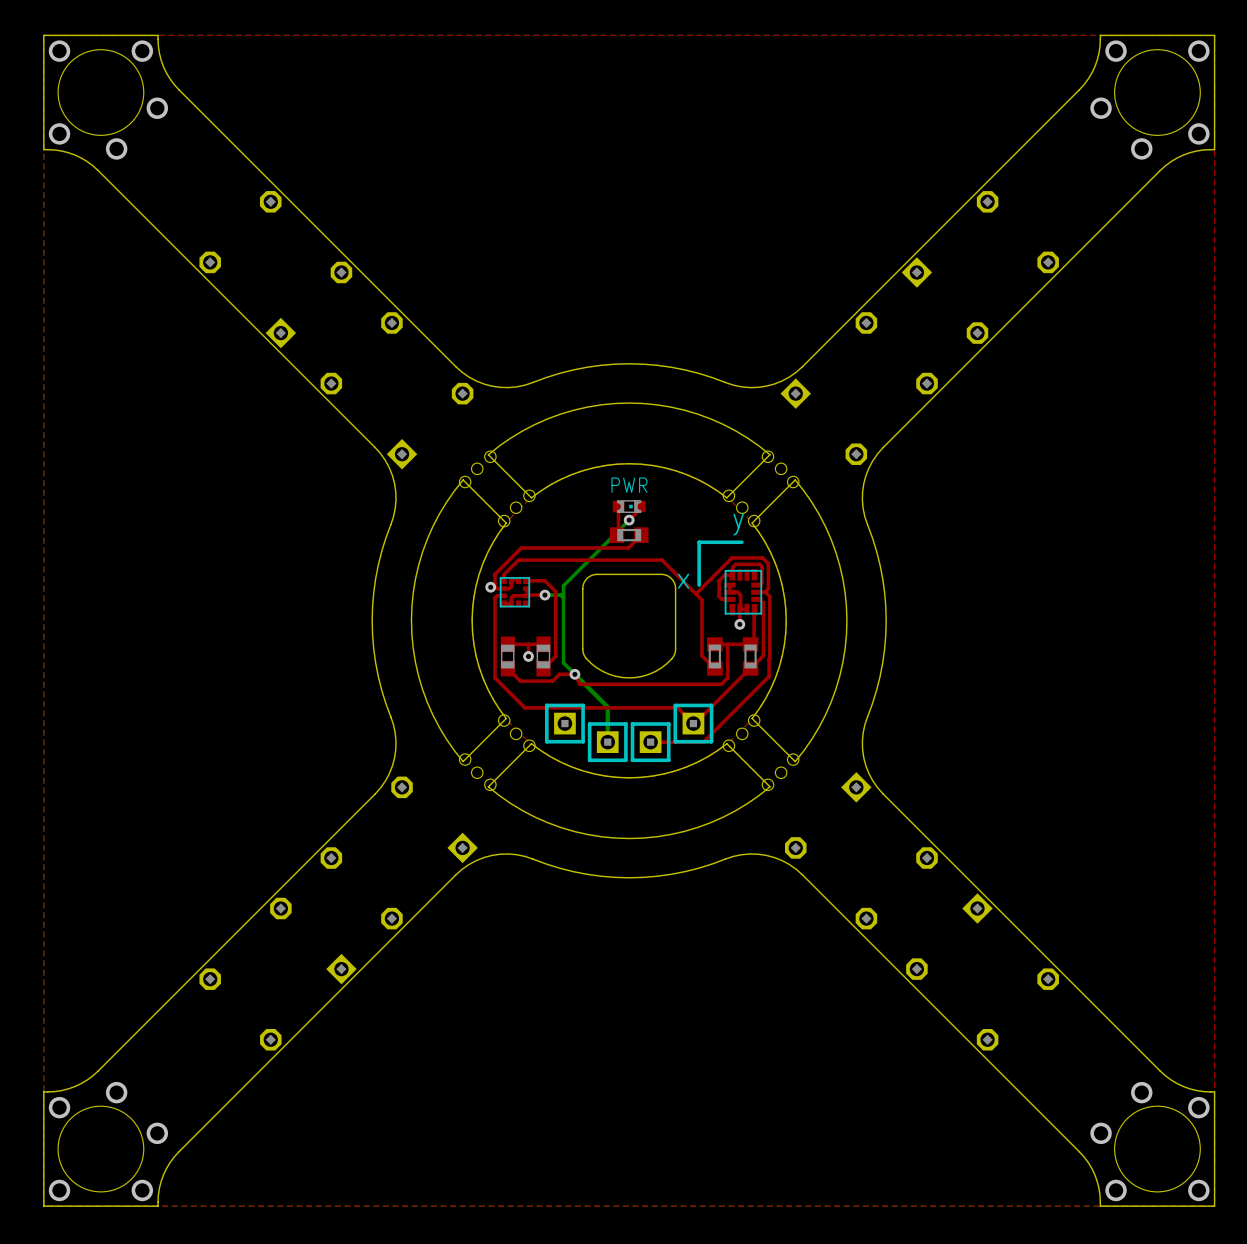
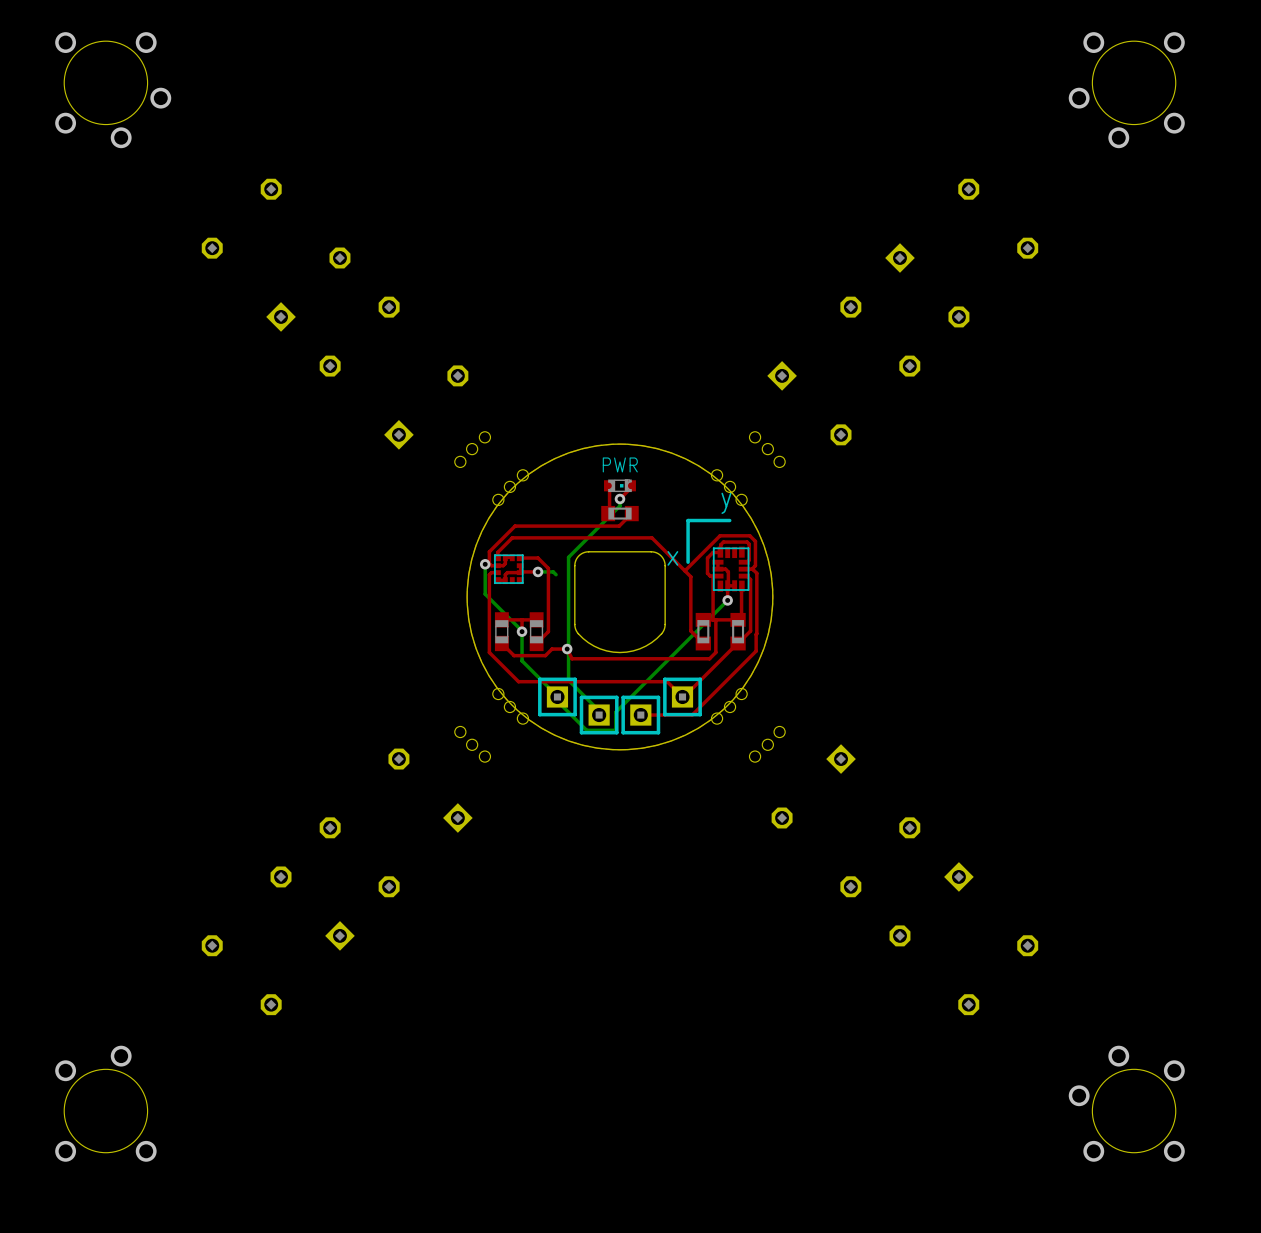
board edge: (43, 35) (43, 149) (61, 151) (75, 155) (98, 170) (375, 447) (385, 460) (392, 475) (395, 500) (393, 516) (378, 564) (373, 592) (372, 620) (373, 648) (378, 676) (395, 732) (395, 749) (389, 773) (375, 794) (98, 1071) (75, 1086) (61, 1090) (43, 1091) (43, 1206) (158, 1206) (159, 1188) (163, 1174) (178, 1151) (455, 874) (468, 864) (484, 857) (508, 853) (525, 856) (573, 871) (601, 876) (629, 877) (657, 876) (685, 871) (741, 854) (758, 854) (782, 860) (802, 874) (1079, 1151) (1094, 1174) (1098, 1188) (1100, 1206) (1214, 1206) (1214, 1091) (1196, 1090) (1183, 1086) (1160, 1071) (883, 794) (868, 773) (863, 757) (862, 741) (864, 724) (880, 676) (884, 648) (886, 620) (884, 592) (880, 564) (863, 508) (862, 491) (868, 467) (883, 447) (1160, 170) (1183, 155) (1196, 151) (1214, 149) (1214, 35) (1100, 35) (1098, 53) (1094, 66) (1079, 89) (802, 366) (782, 380) (766, 386) (749, 387) (733, 385) (685, 369) (657, 365) (629, 363) (601, 365) (573, 369) (517, 386) (500, 387) (476, 380) (455, 366) (178, 89) (163, 66) (159, 53) (158, 35) (43, 35) -> none
top zone outline: (43, 35) (1214, 35) (1214, 1206) (43, 1206) (43, 35) -> none
board edge: (488, 454) (531, 497) (550, 484) (571, 474) (594, 467) (629, 463) (664, 467) (686, 474) (707, 484) (726, 497) (770, 454) (747, 438) (710, 418) (670, 407) (629, 403) (587, 407) (547, 418) (510, 438) (488, 454) -> none
round board edge: none -> [466, 443, 774, 751]
board edge: (463, 479) (506, 523) (493, 542) (482, 563) (476, 585) (472, 620) (476, 655) (482, 678) (493, 699) (506, 718) (463, 761) (446, 739) (427, 702) (415, 662) (411, 620) (415, 579) (427, 539) (446, 502) (463, 479) -> none
board edge: (795, 479) (752, 523) (765, 542) (775, 563) (782, 585) (786, 620) (782, 655) (775, 678) (765, 699) (752, 718) (795, 761) (811, 739) (831, 702) (842, 662) (846, 620) (842, 579) (831, 539) (811, 502) (795, 479) -> none
bottom track: (629, 520) (563, 585) (563, 662) (607, 707) (607, 737) -> (619, 498) (619, 505) (568, 557) (568, 680) (599, 710)
bottom track: none -> (485, 564) (485, 594) (521, 630) (522, 660) (556, 695) (557, 701) (586, 730) (615, 730) (615, 712) (727, 600)
top track: none -> (713, 577) (713, 619)
board edge: (531, 743) (488, 786) (510, 803) (534, 817) (560, 827) (587, 834) (629, 838) (656, 836) (684, 831) (723, 817) (747, 803) (770, 786) (726, 743) (707, 756) (686, 767) (664, 773) (629, 777) (594, 773) (571, 767) (550, 756) (531, 743) -> none
via: (157, 1133) -> none

